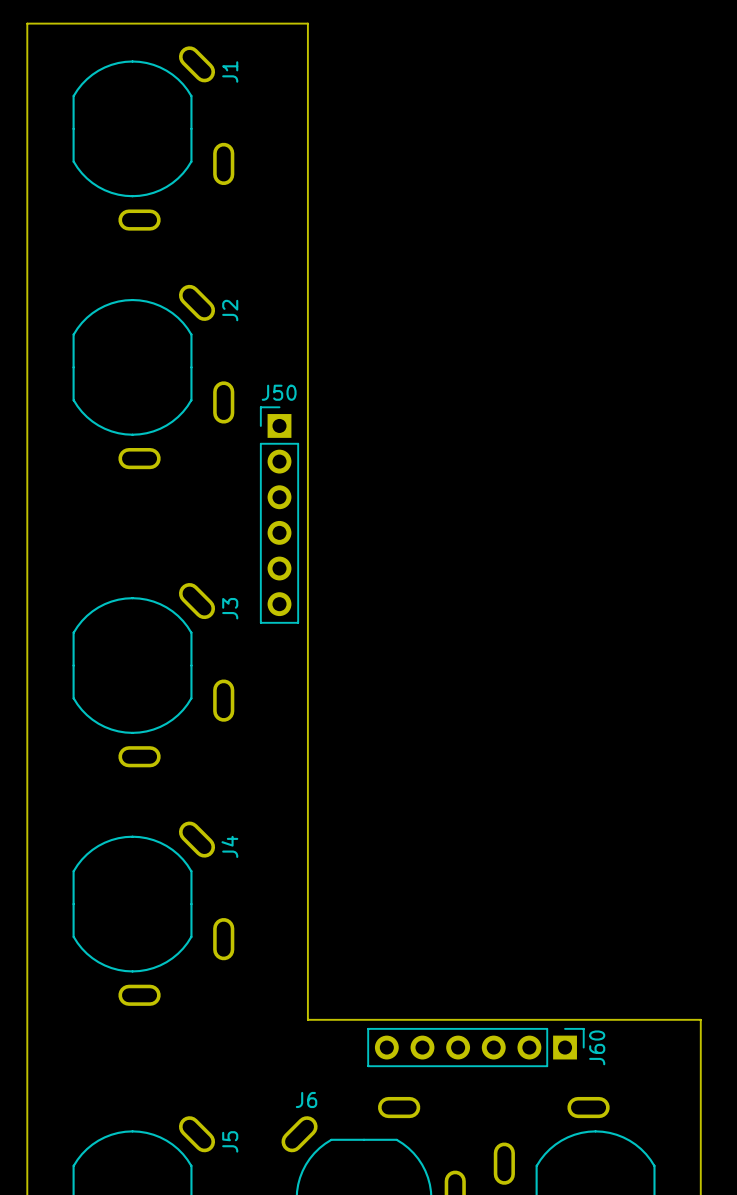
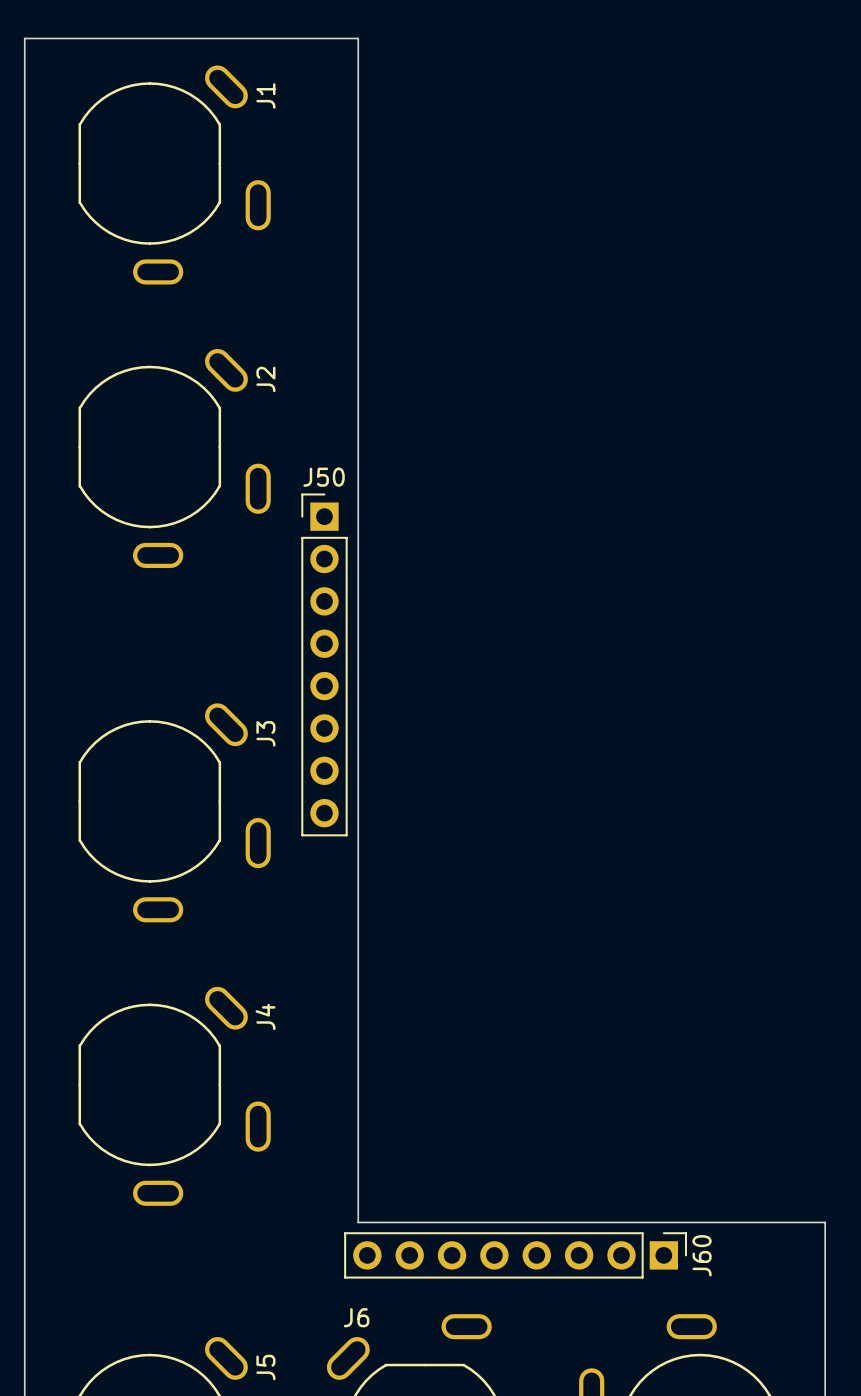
J50 footprint: [260, 406, 300, 624] -> [301, 493, 348, 837]
J60 footprint: [367, 1028, 585, 1068] -> [344, 1232, 688, 1279]

